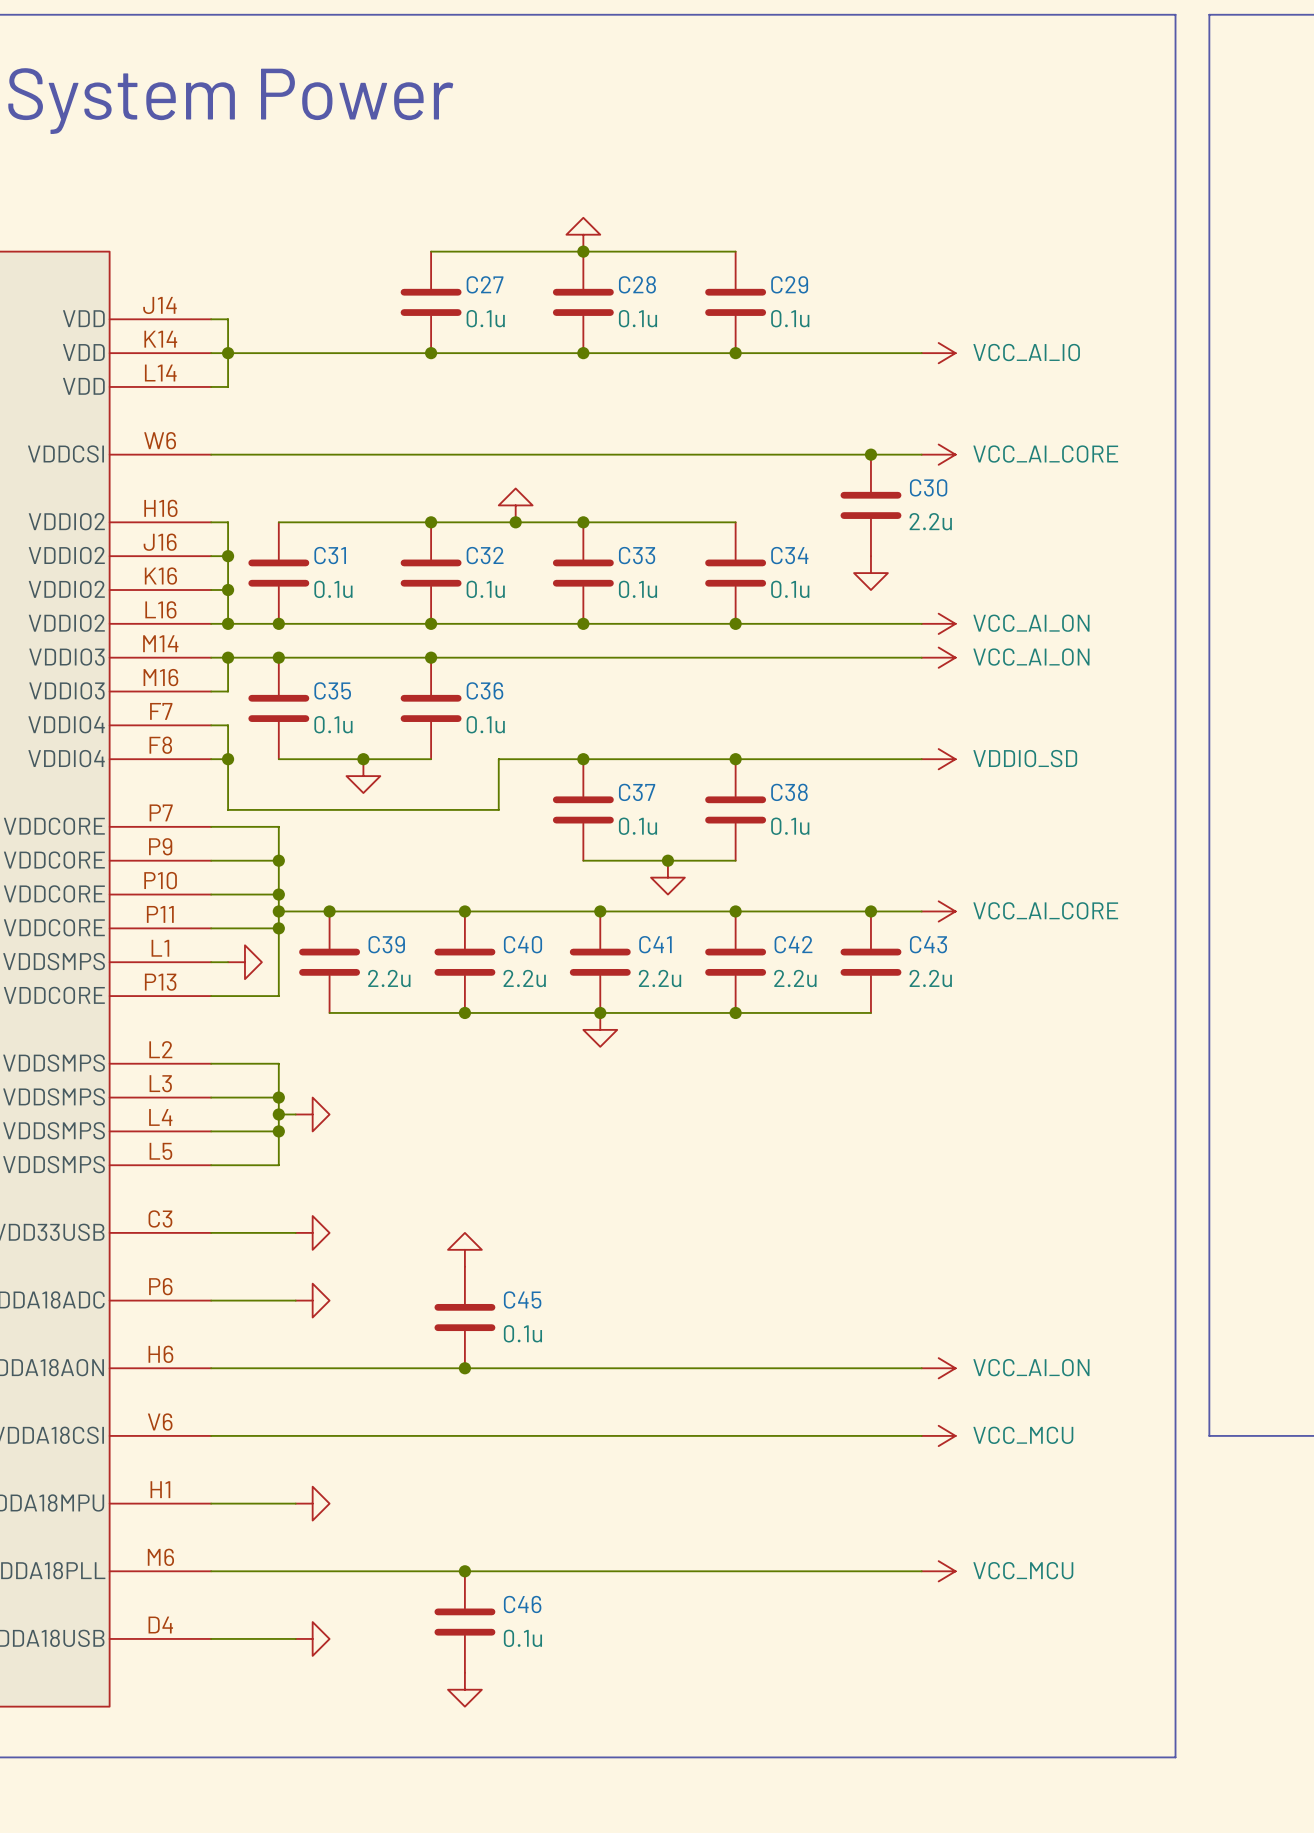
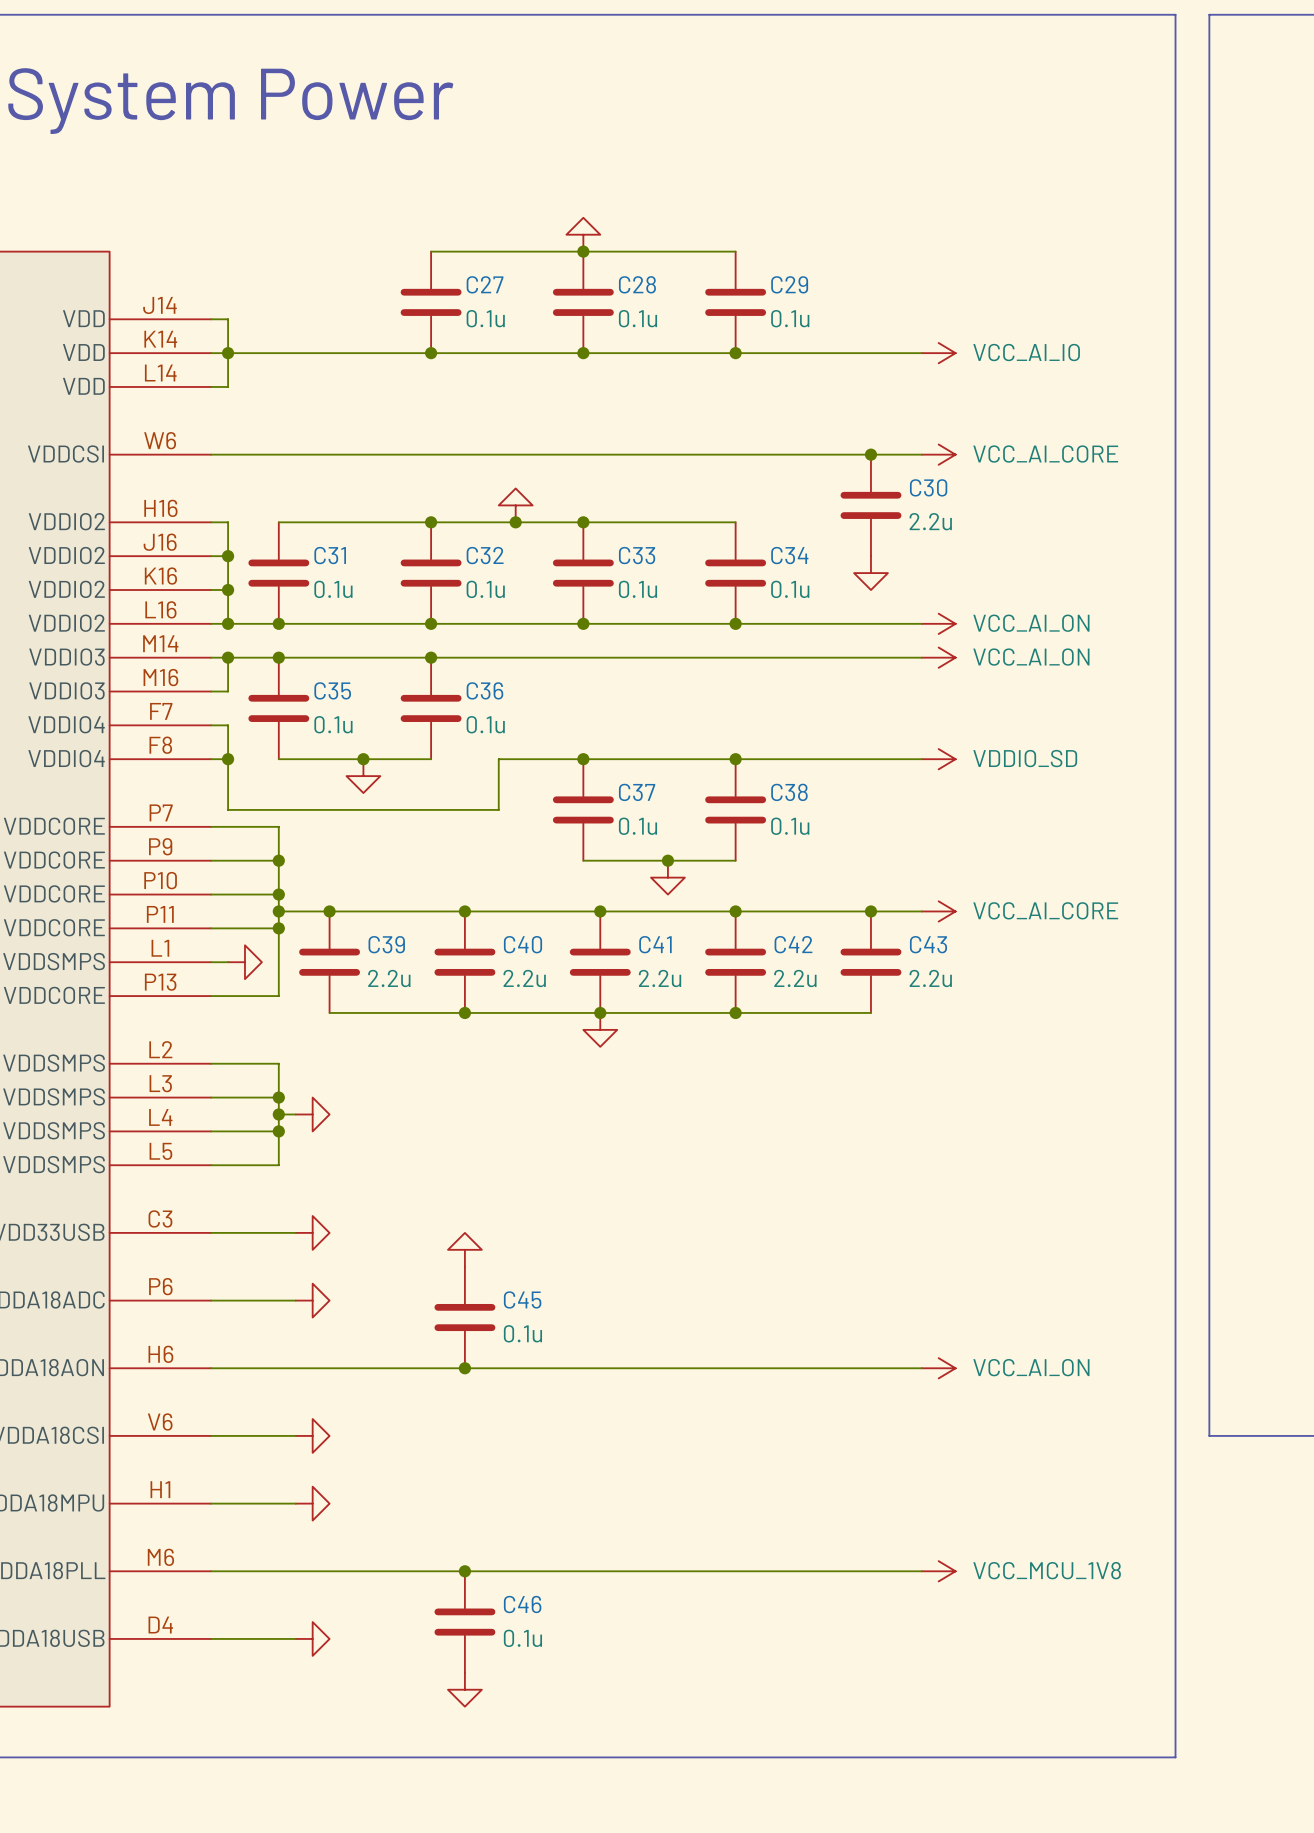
wire: (295, 1435) (921, 1435) -> none
power symbol: none -> (312, 1435)
power symbol: VCC_MCU (938, 1435) -> none
power symbol: VCC_MCU (938, 1571) -> VCC_MCU_1V8 (938, 1571)

